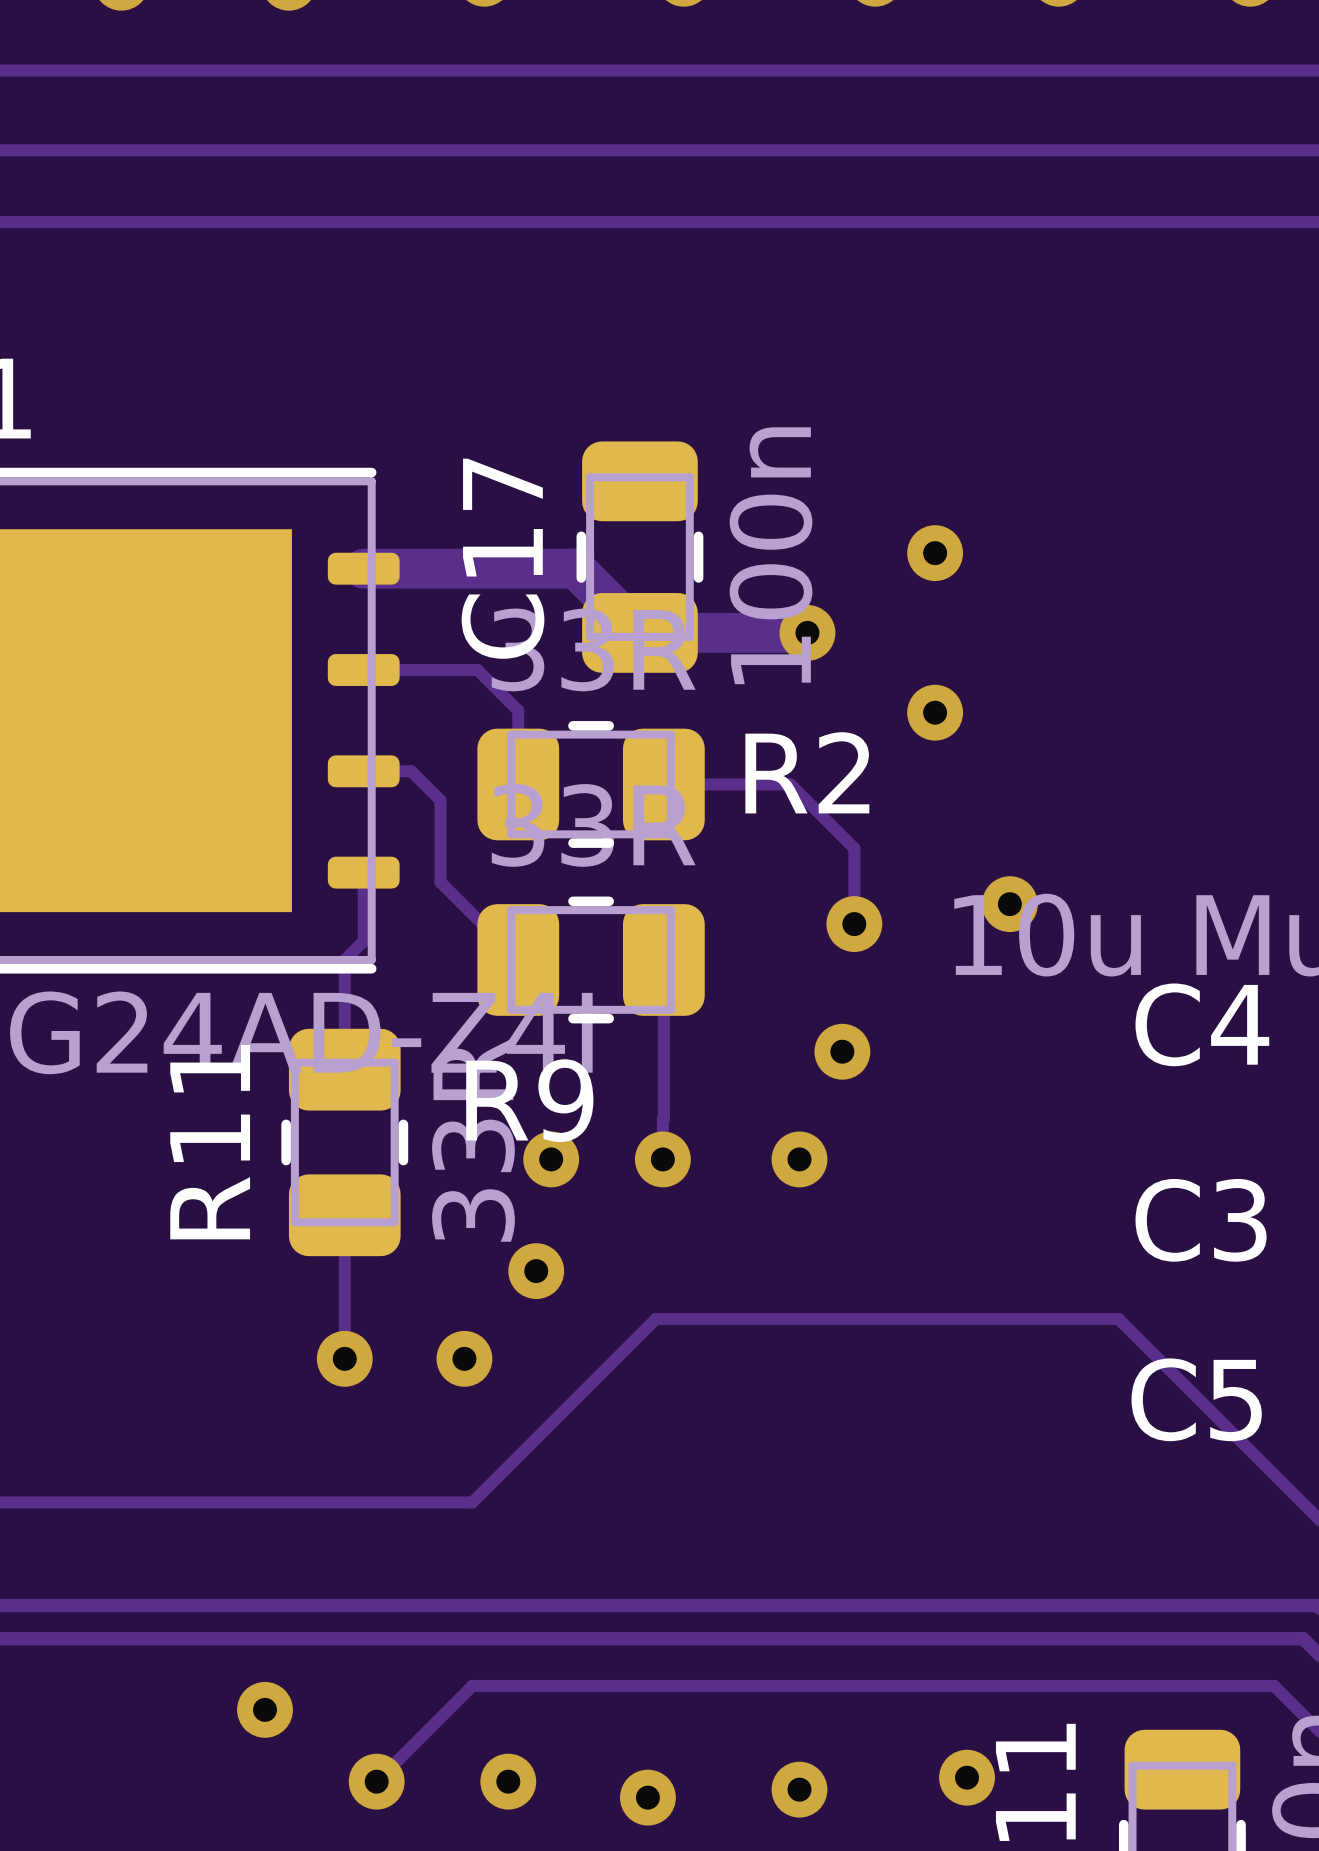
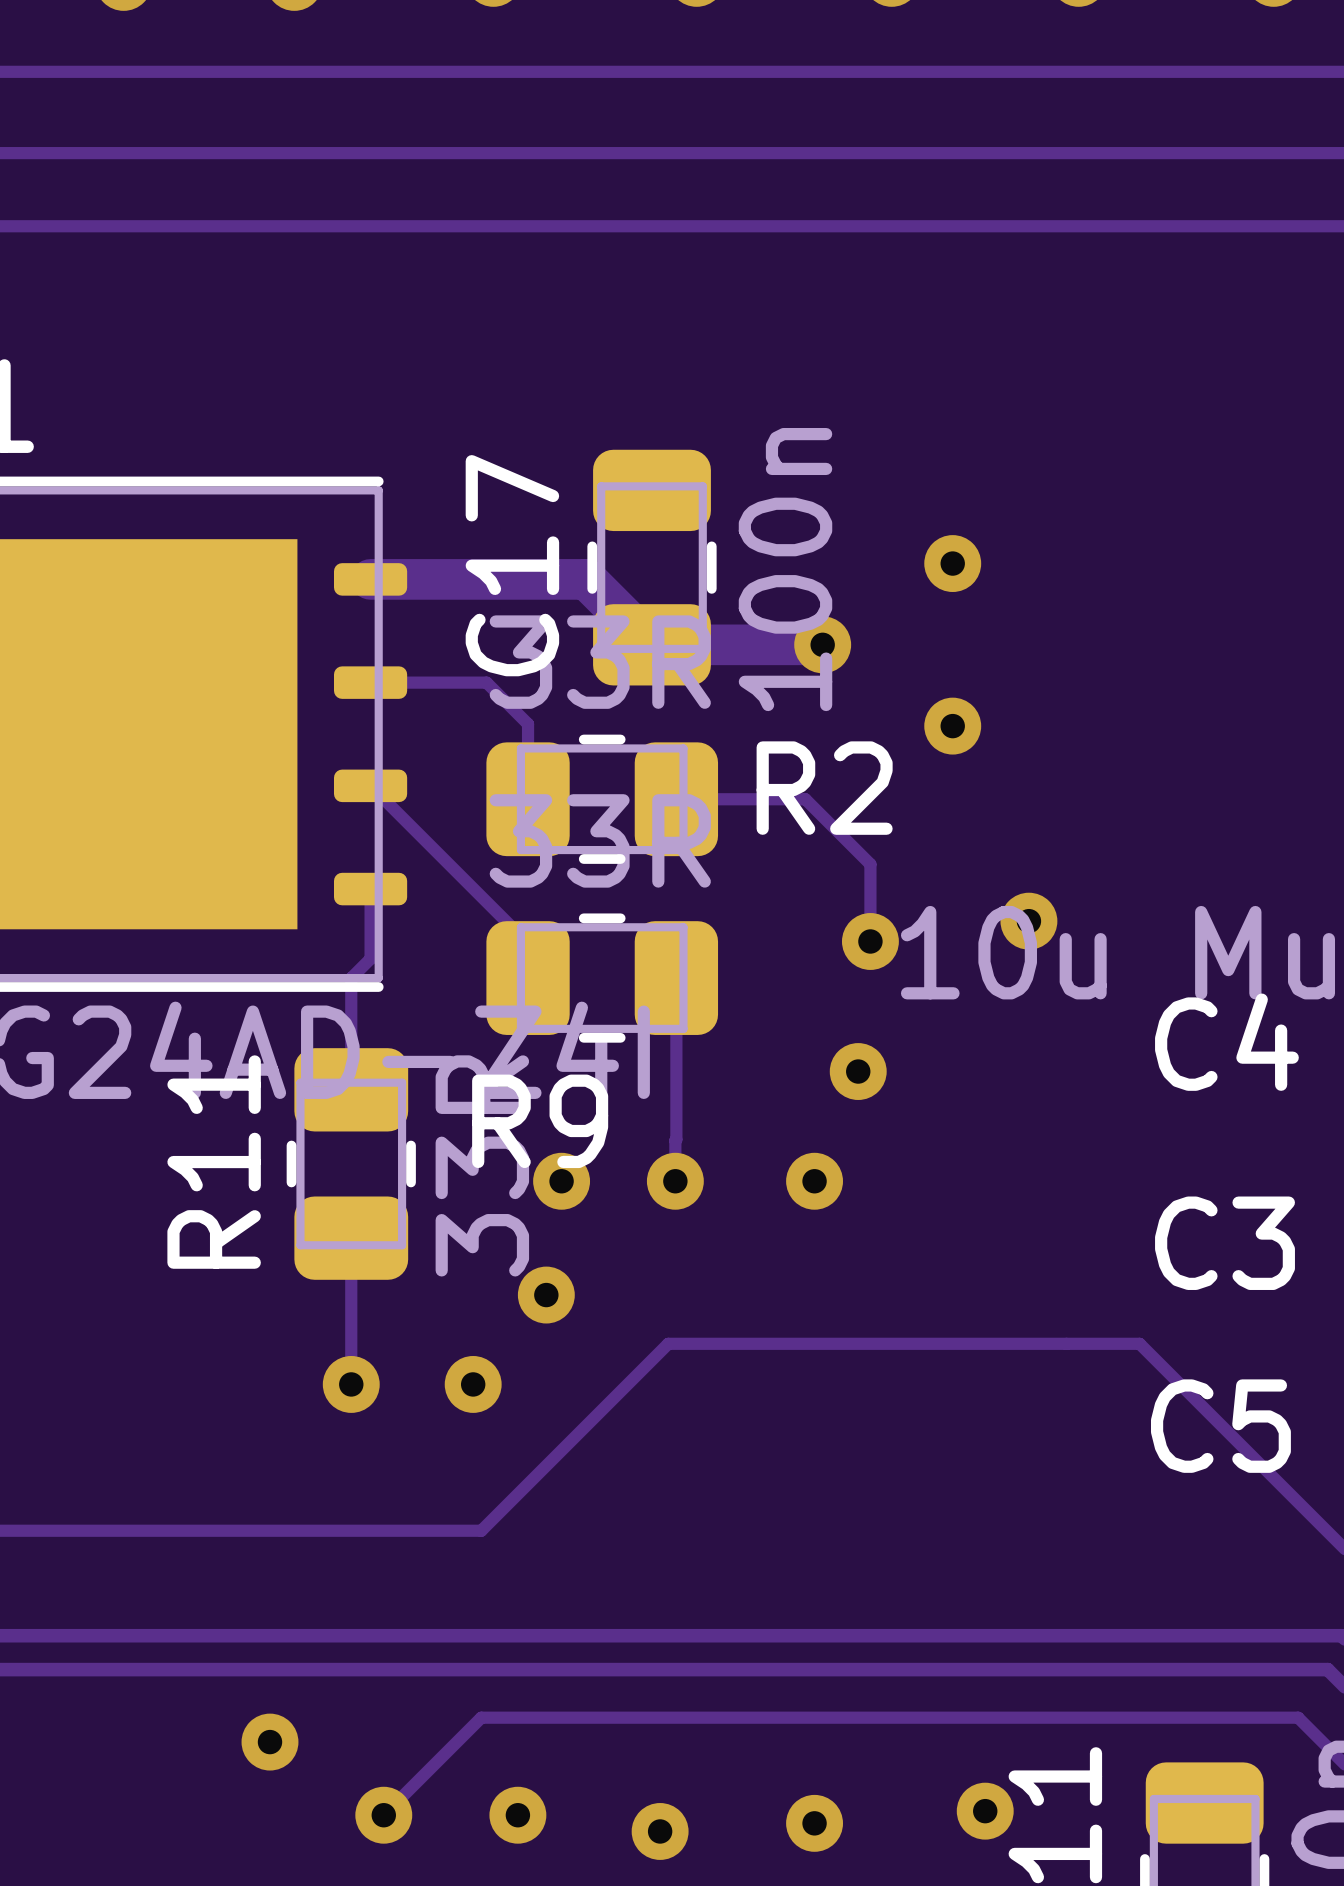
track: (363, 771) (411, 771) (440, 800) (440, 882) (518, 959) -> (370, 785) (528, 943) (528, 978)

